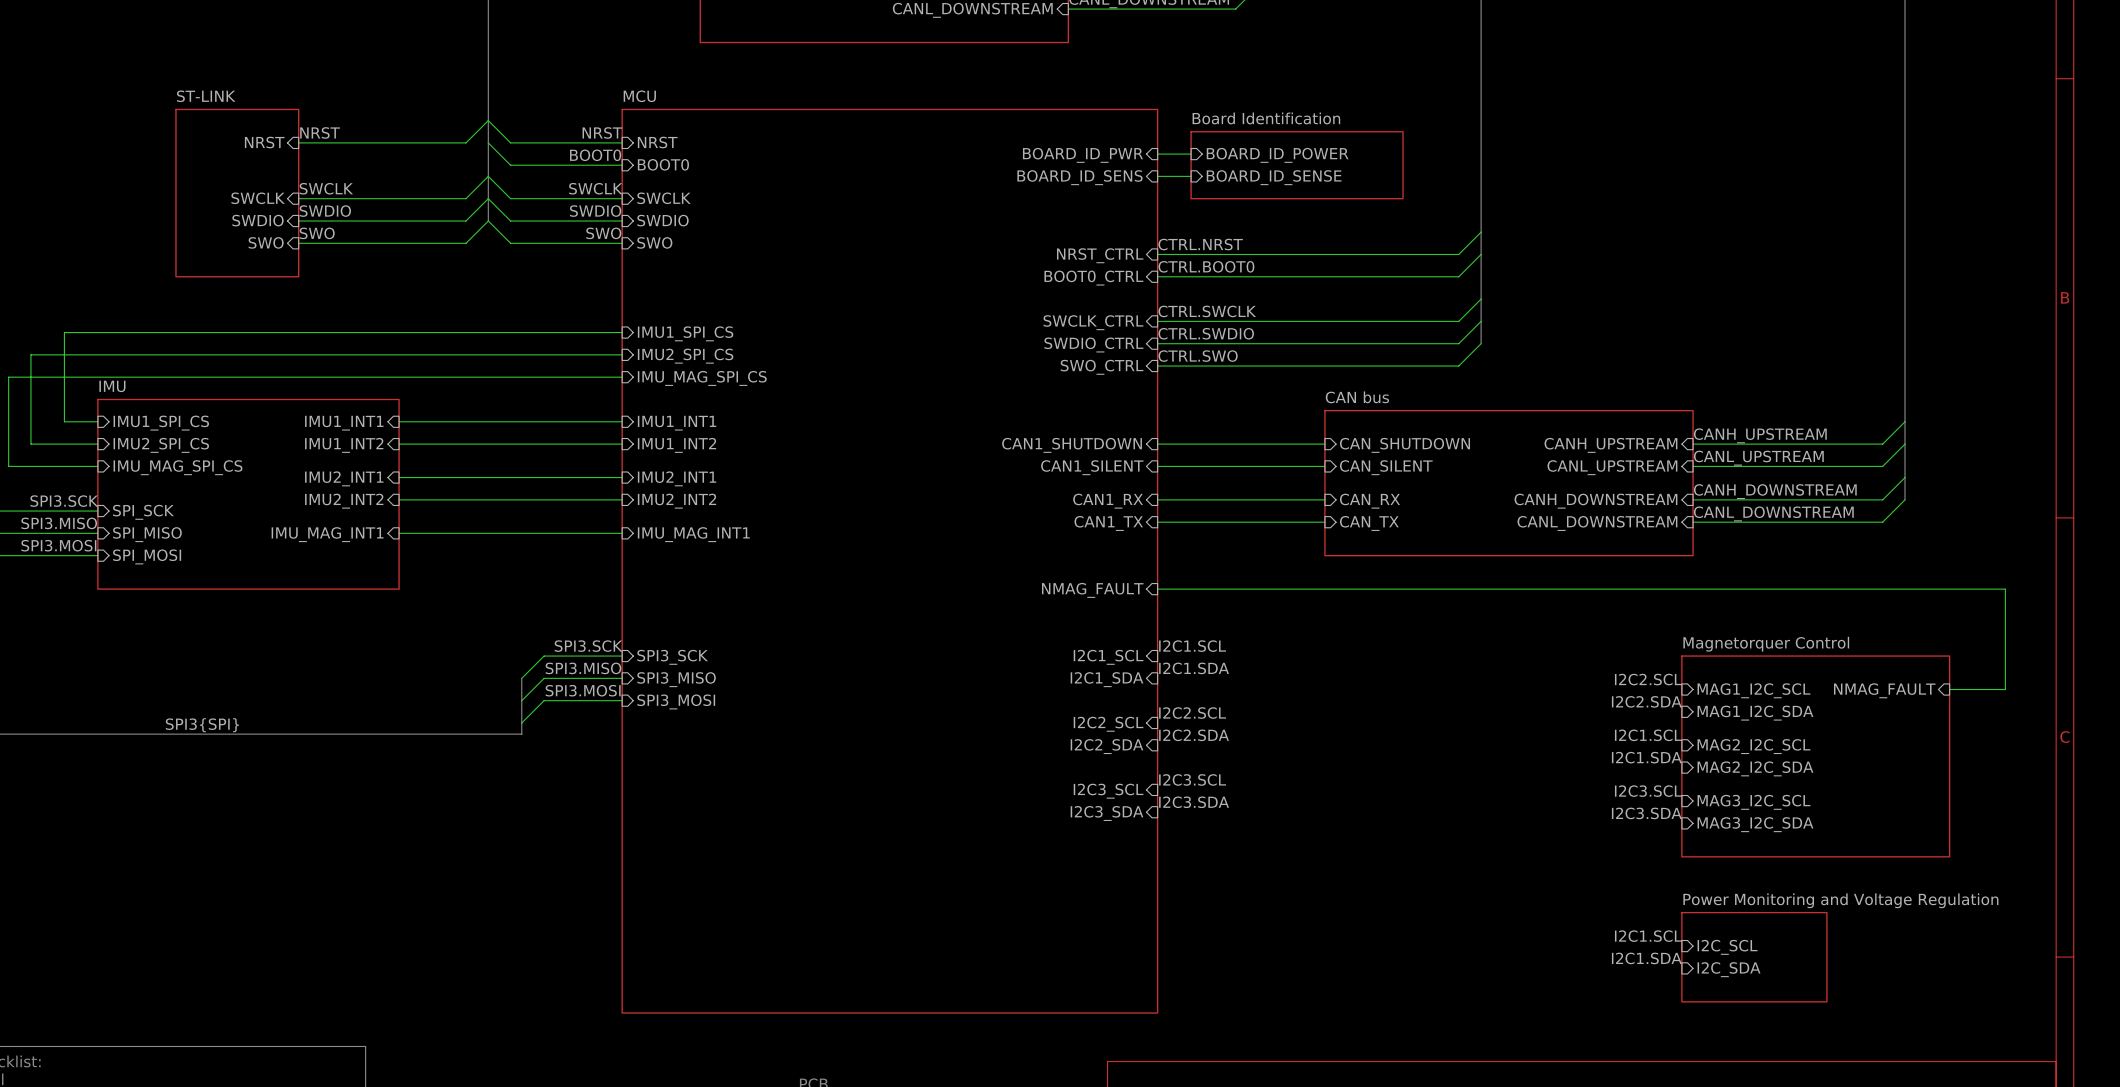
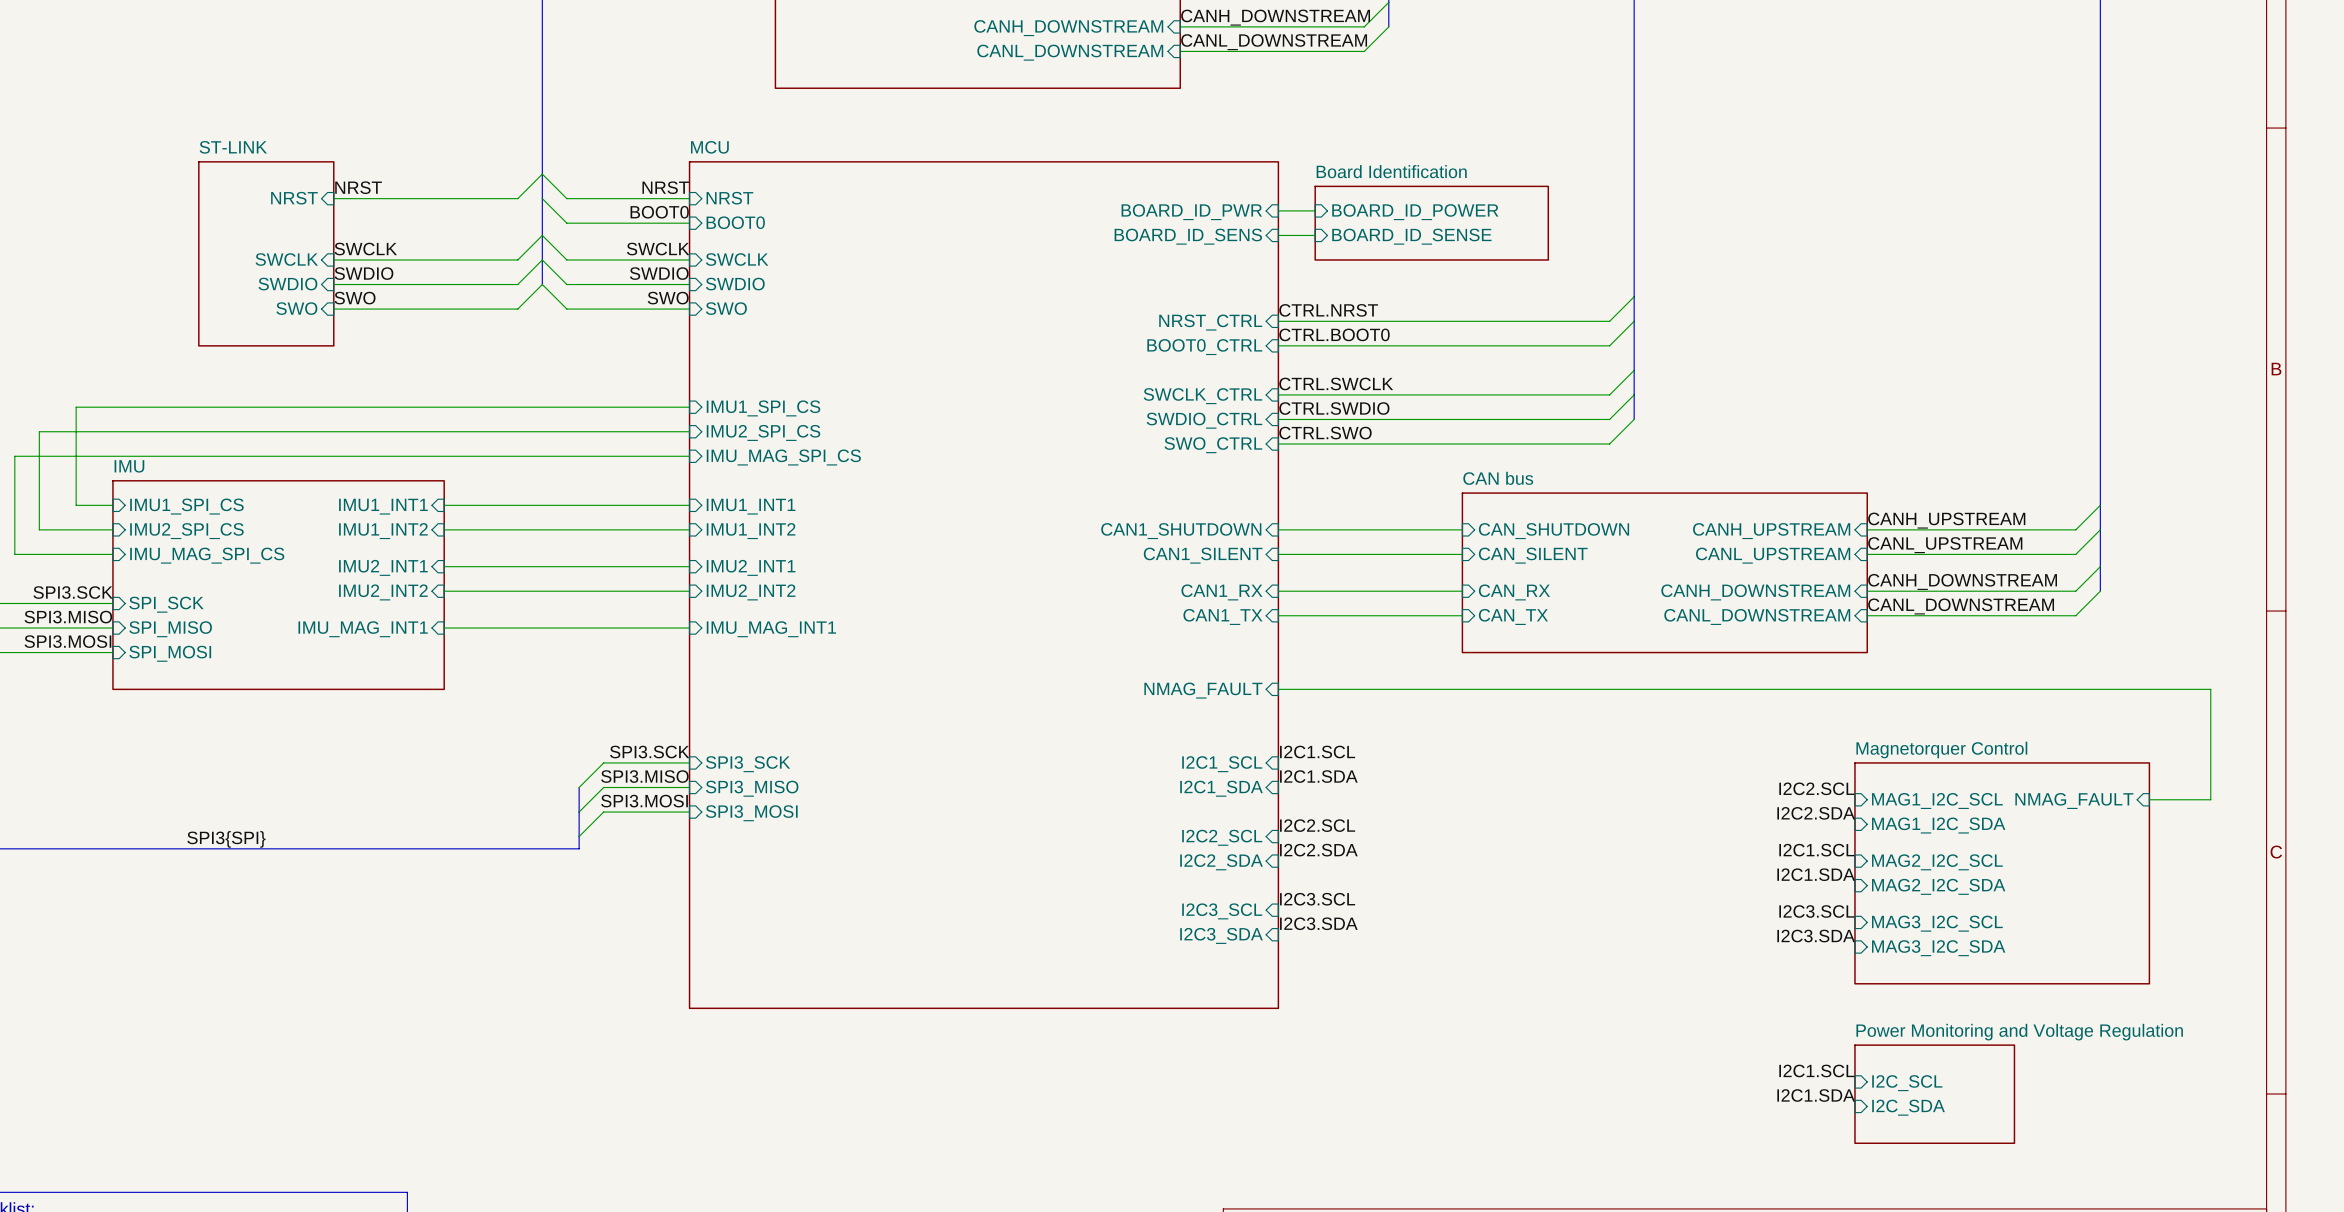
sheet MCU: none -> (983, 585)
sheet MCU: (889, 561) -> none

